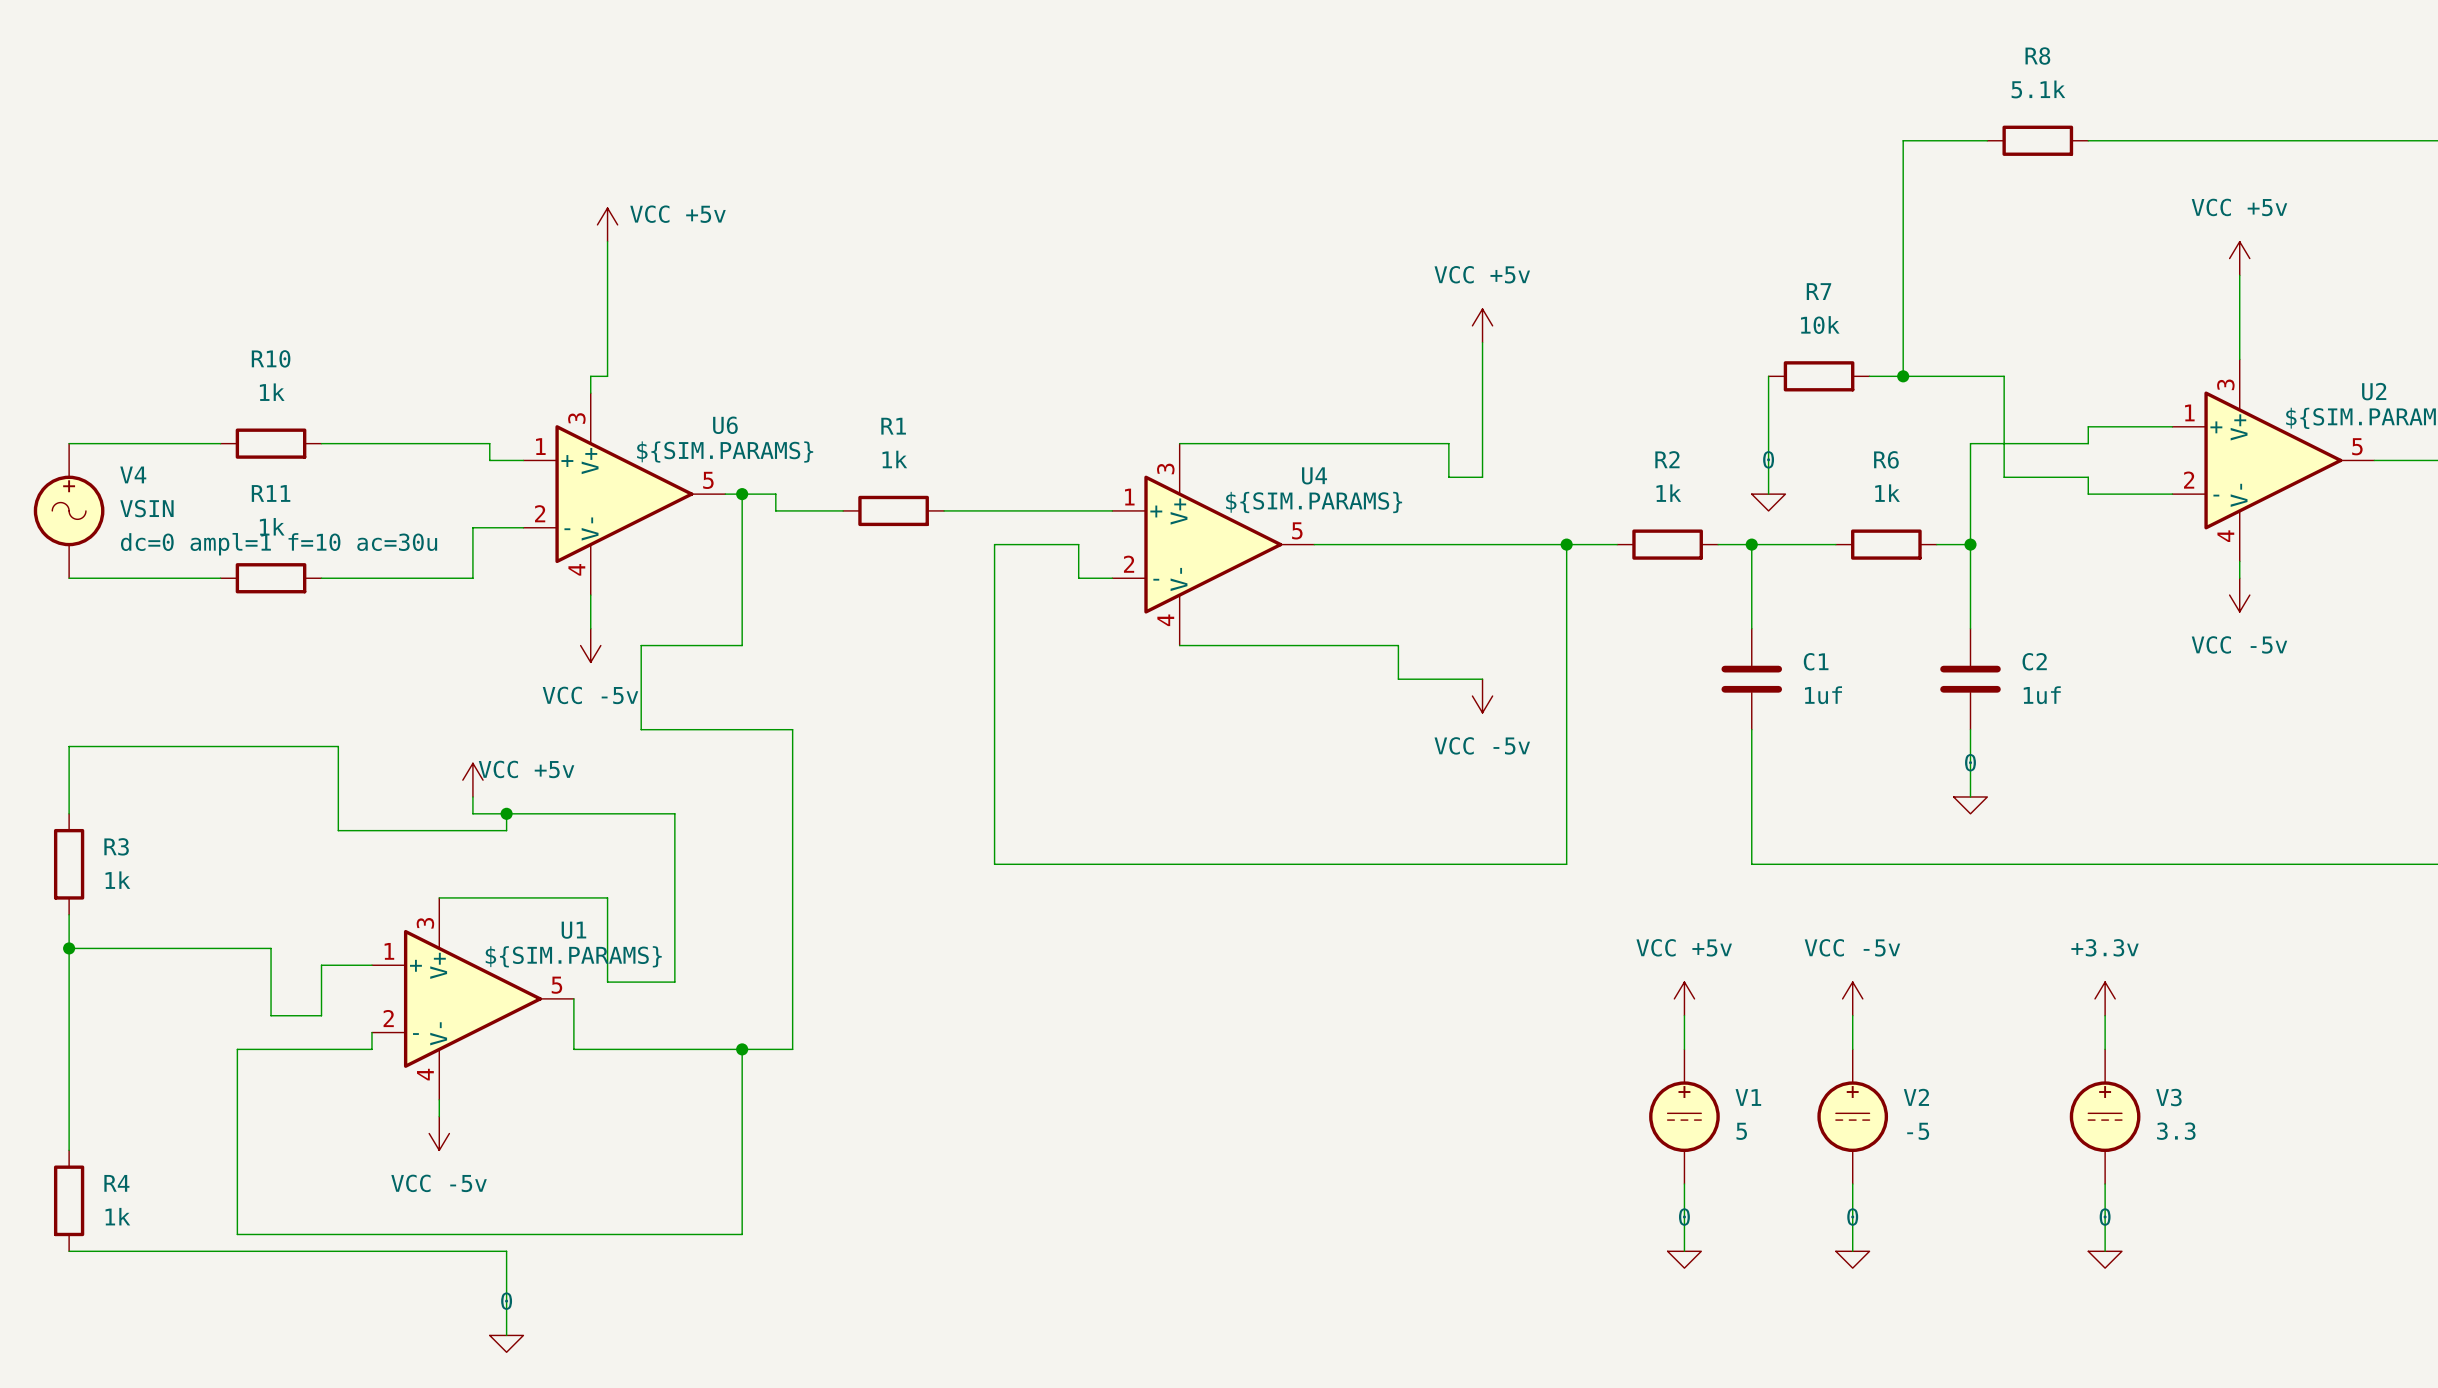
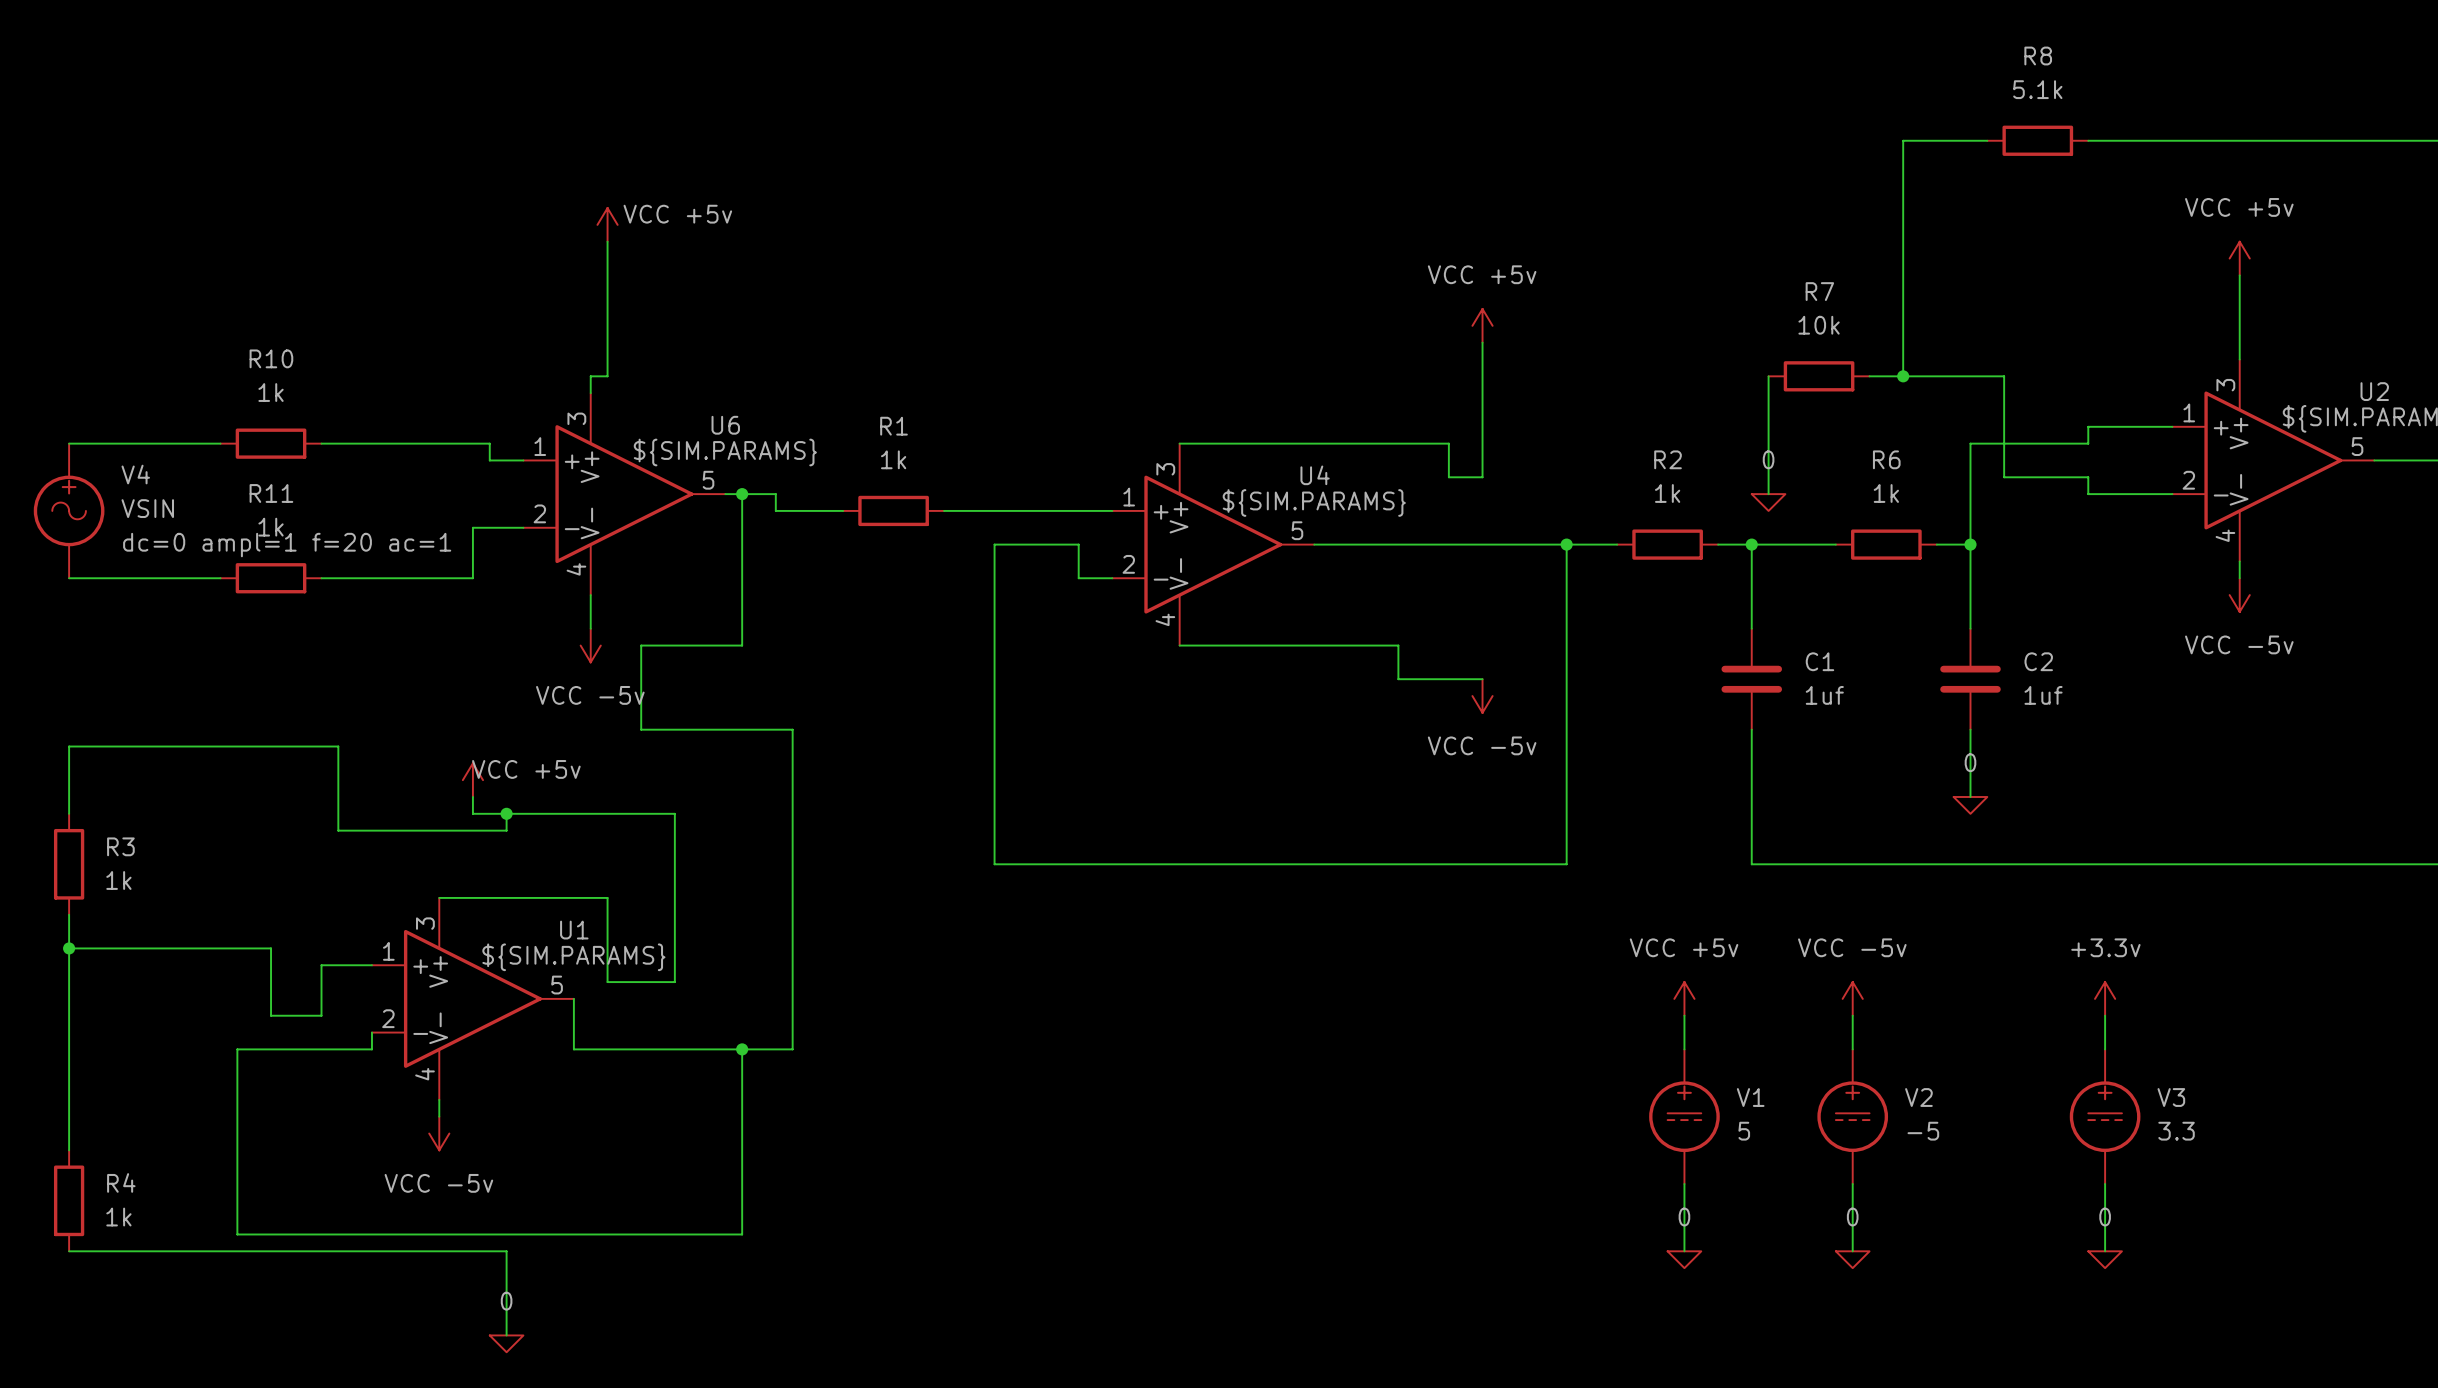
V4 text: dc=0 ampl=1 f=10 ac=30u (279, 544) -> dc=0 ampl=1 f=20 ac=1 (287, 545)

